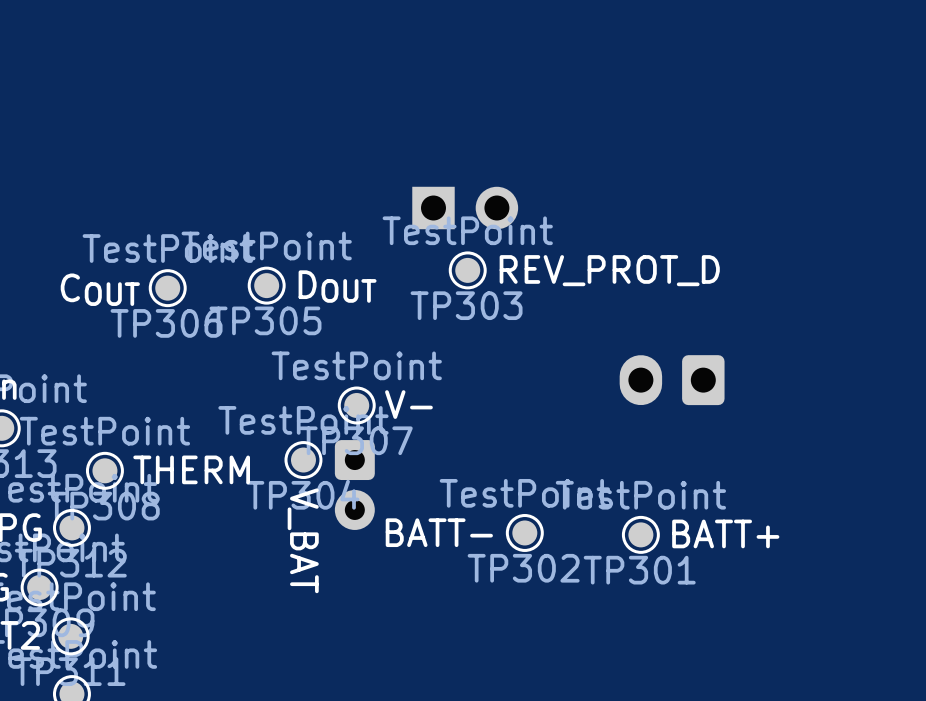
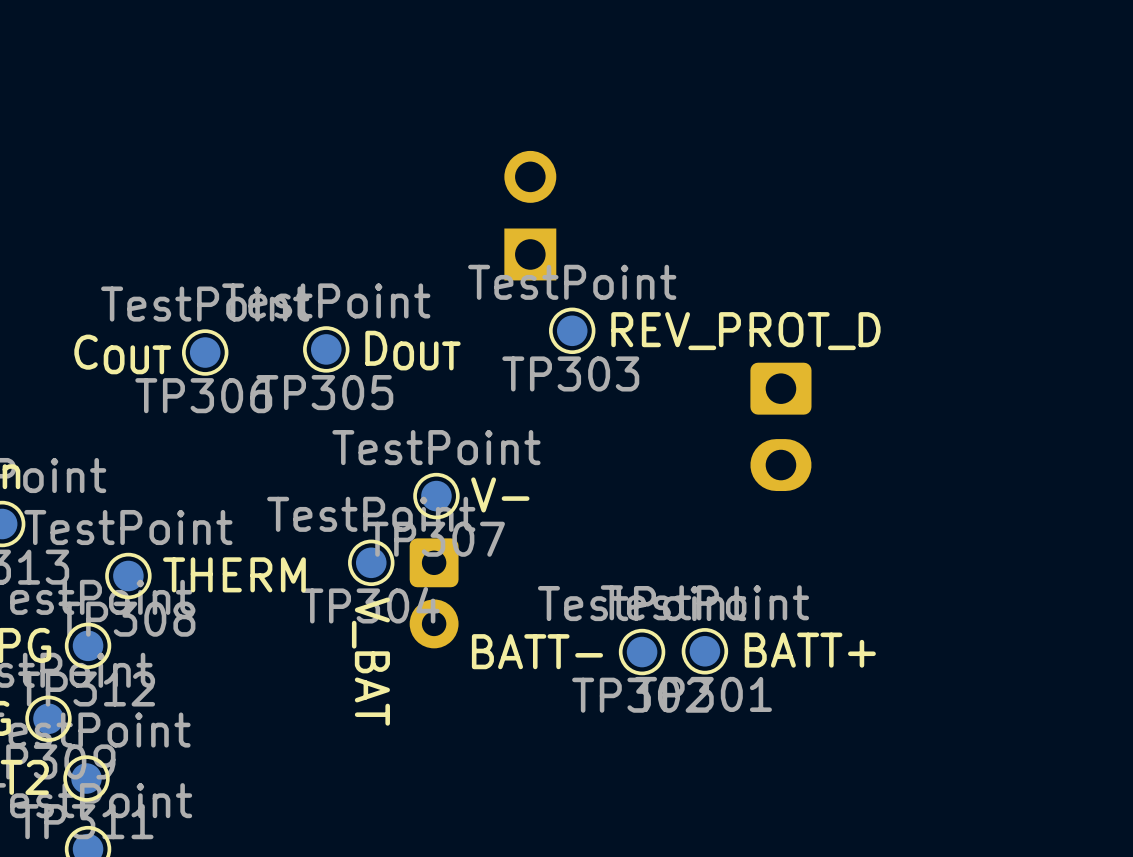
part rotation: 0° (465, 208) -> 90° counterclockwise (530, 215)
part rotation: 0° (672, 380) -> 90° counterclockwise (780, 426)
text position: BATT+ (725, 533) -> BATT+ (810, 650)
TP301 position: (640, 534) -> (704, 651)

